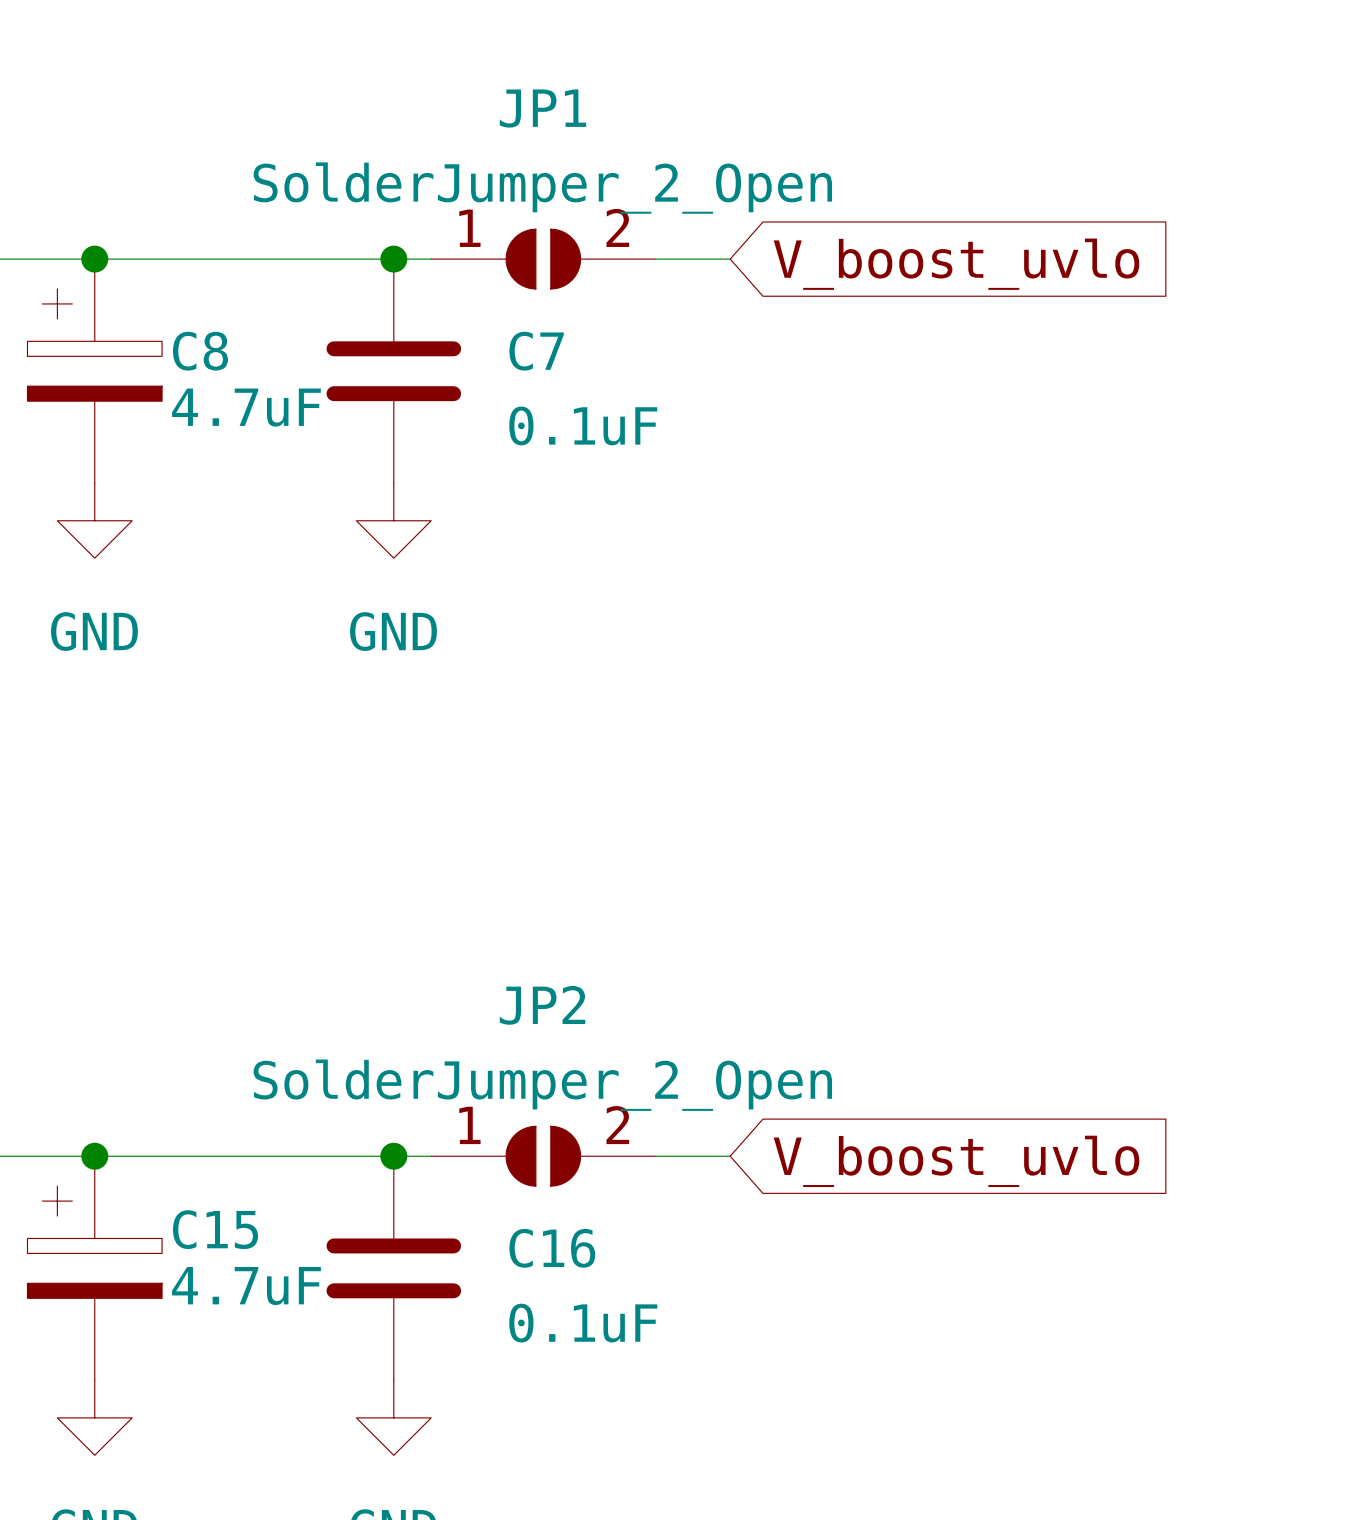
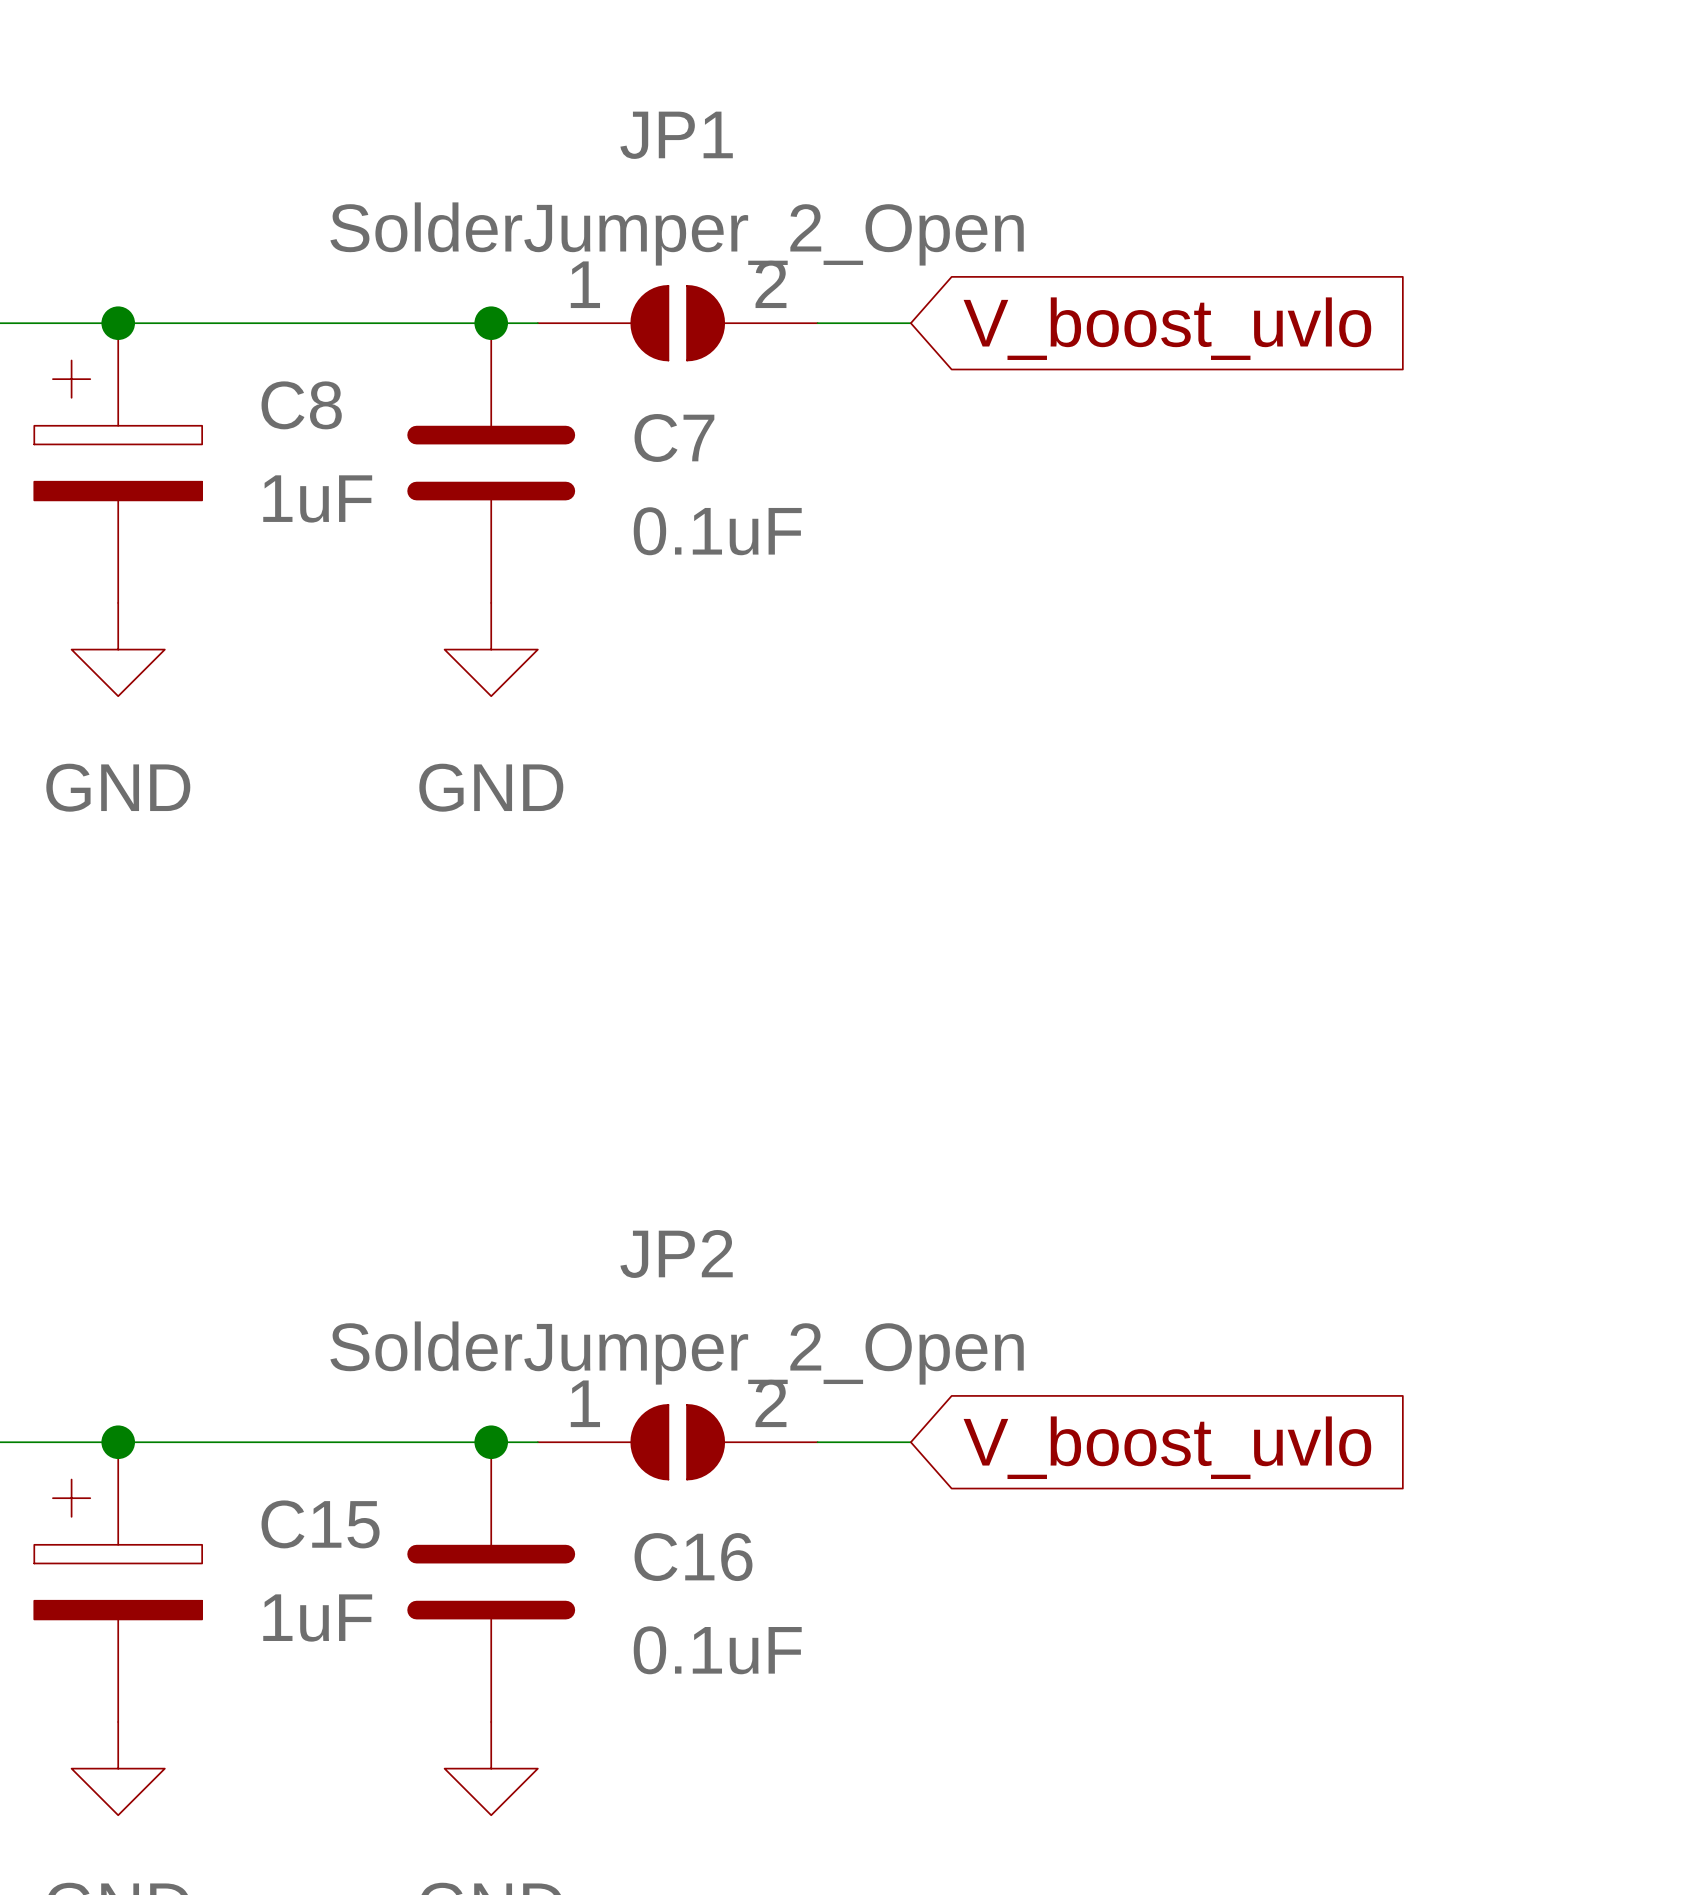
C8 name position: C8 (200, 351) -> C8 (301, 405)
C8 value: 4.7uF (246, 407) -> 1uF (317, 498)
C15 name position: C15 (215, 1229) -> C15 (320, 1524)
C15 value: 4.7uF (246, 1286) -> 1uF (317, 1618)

